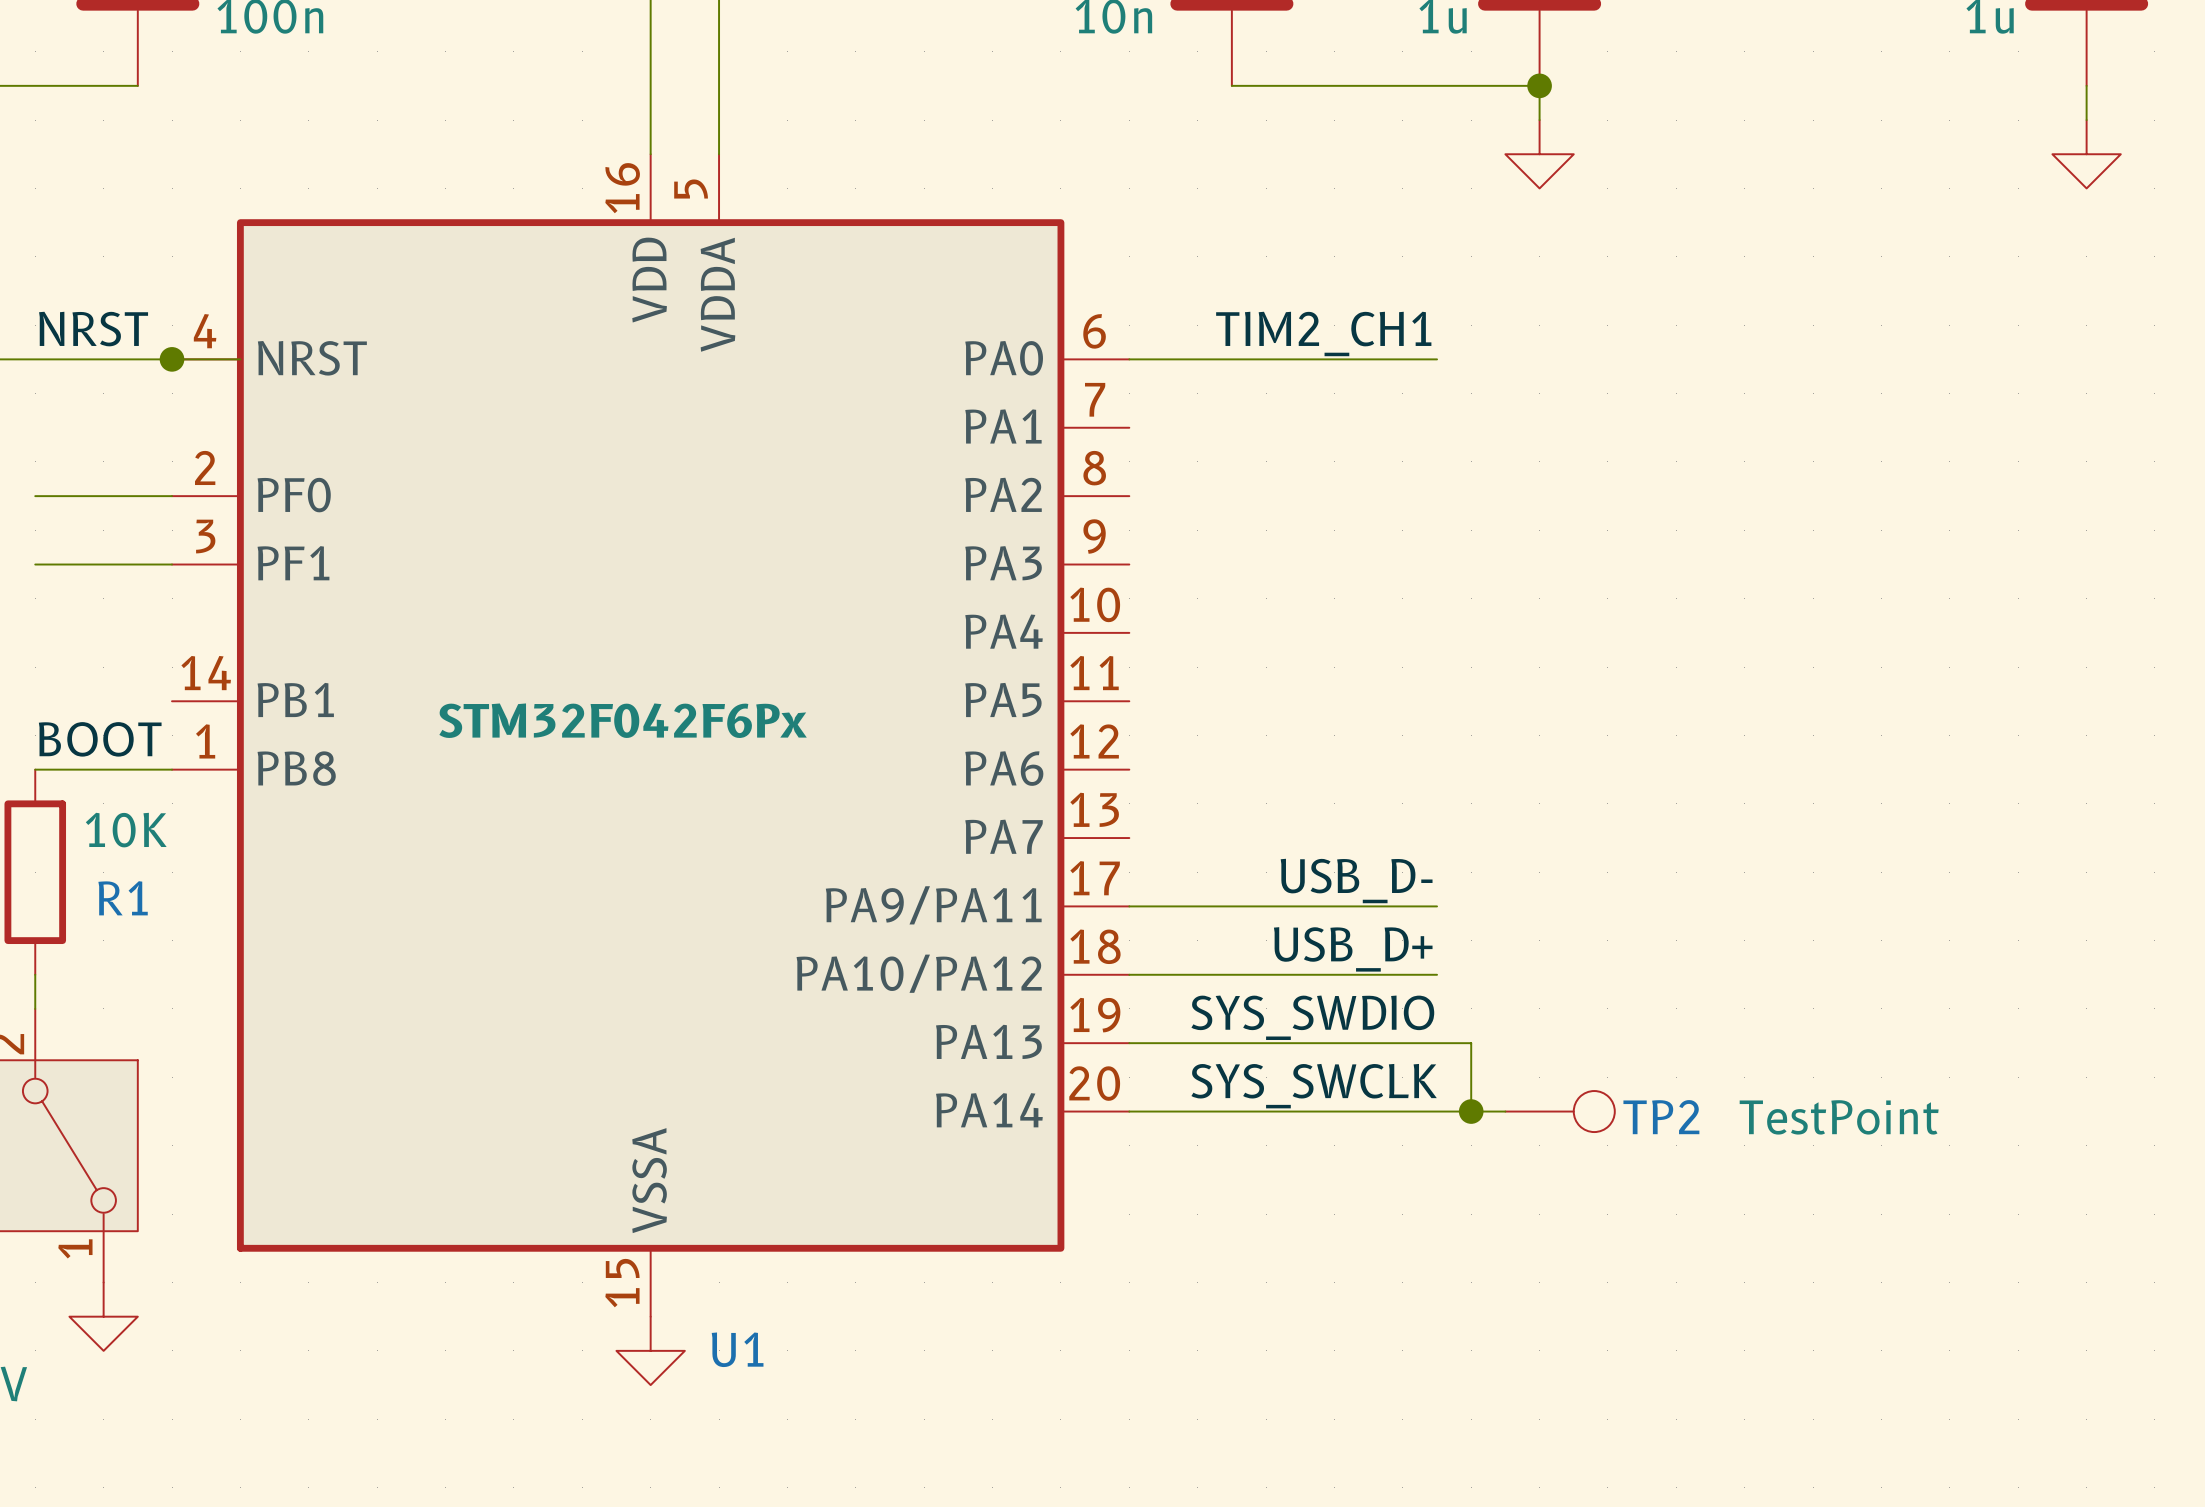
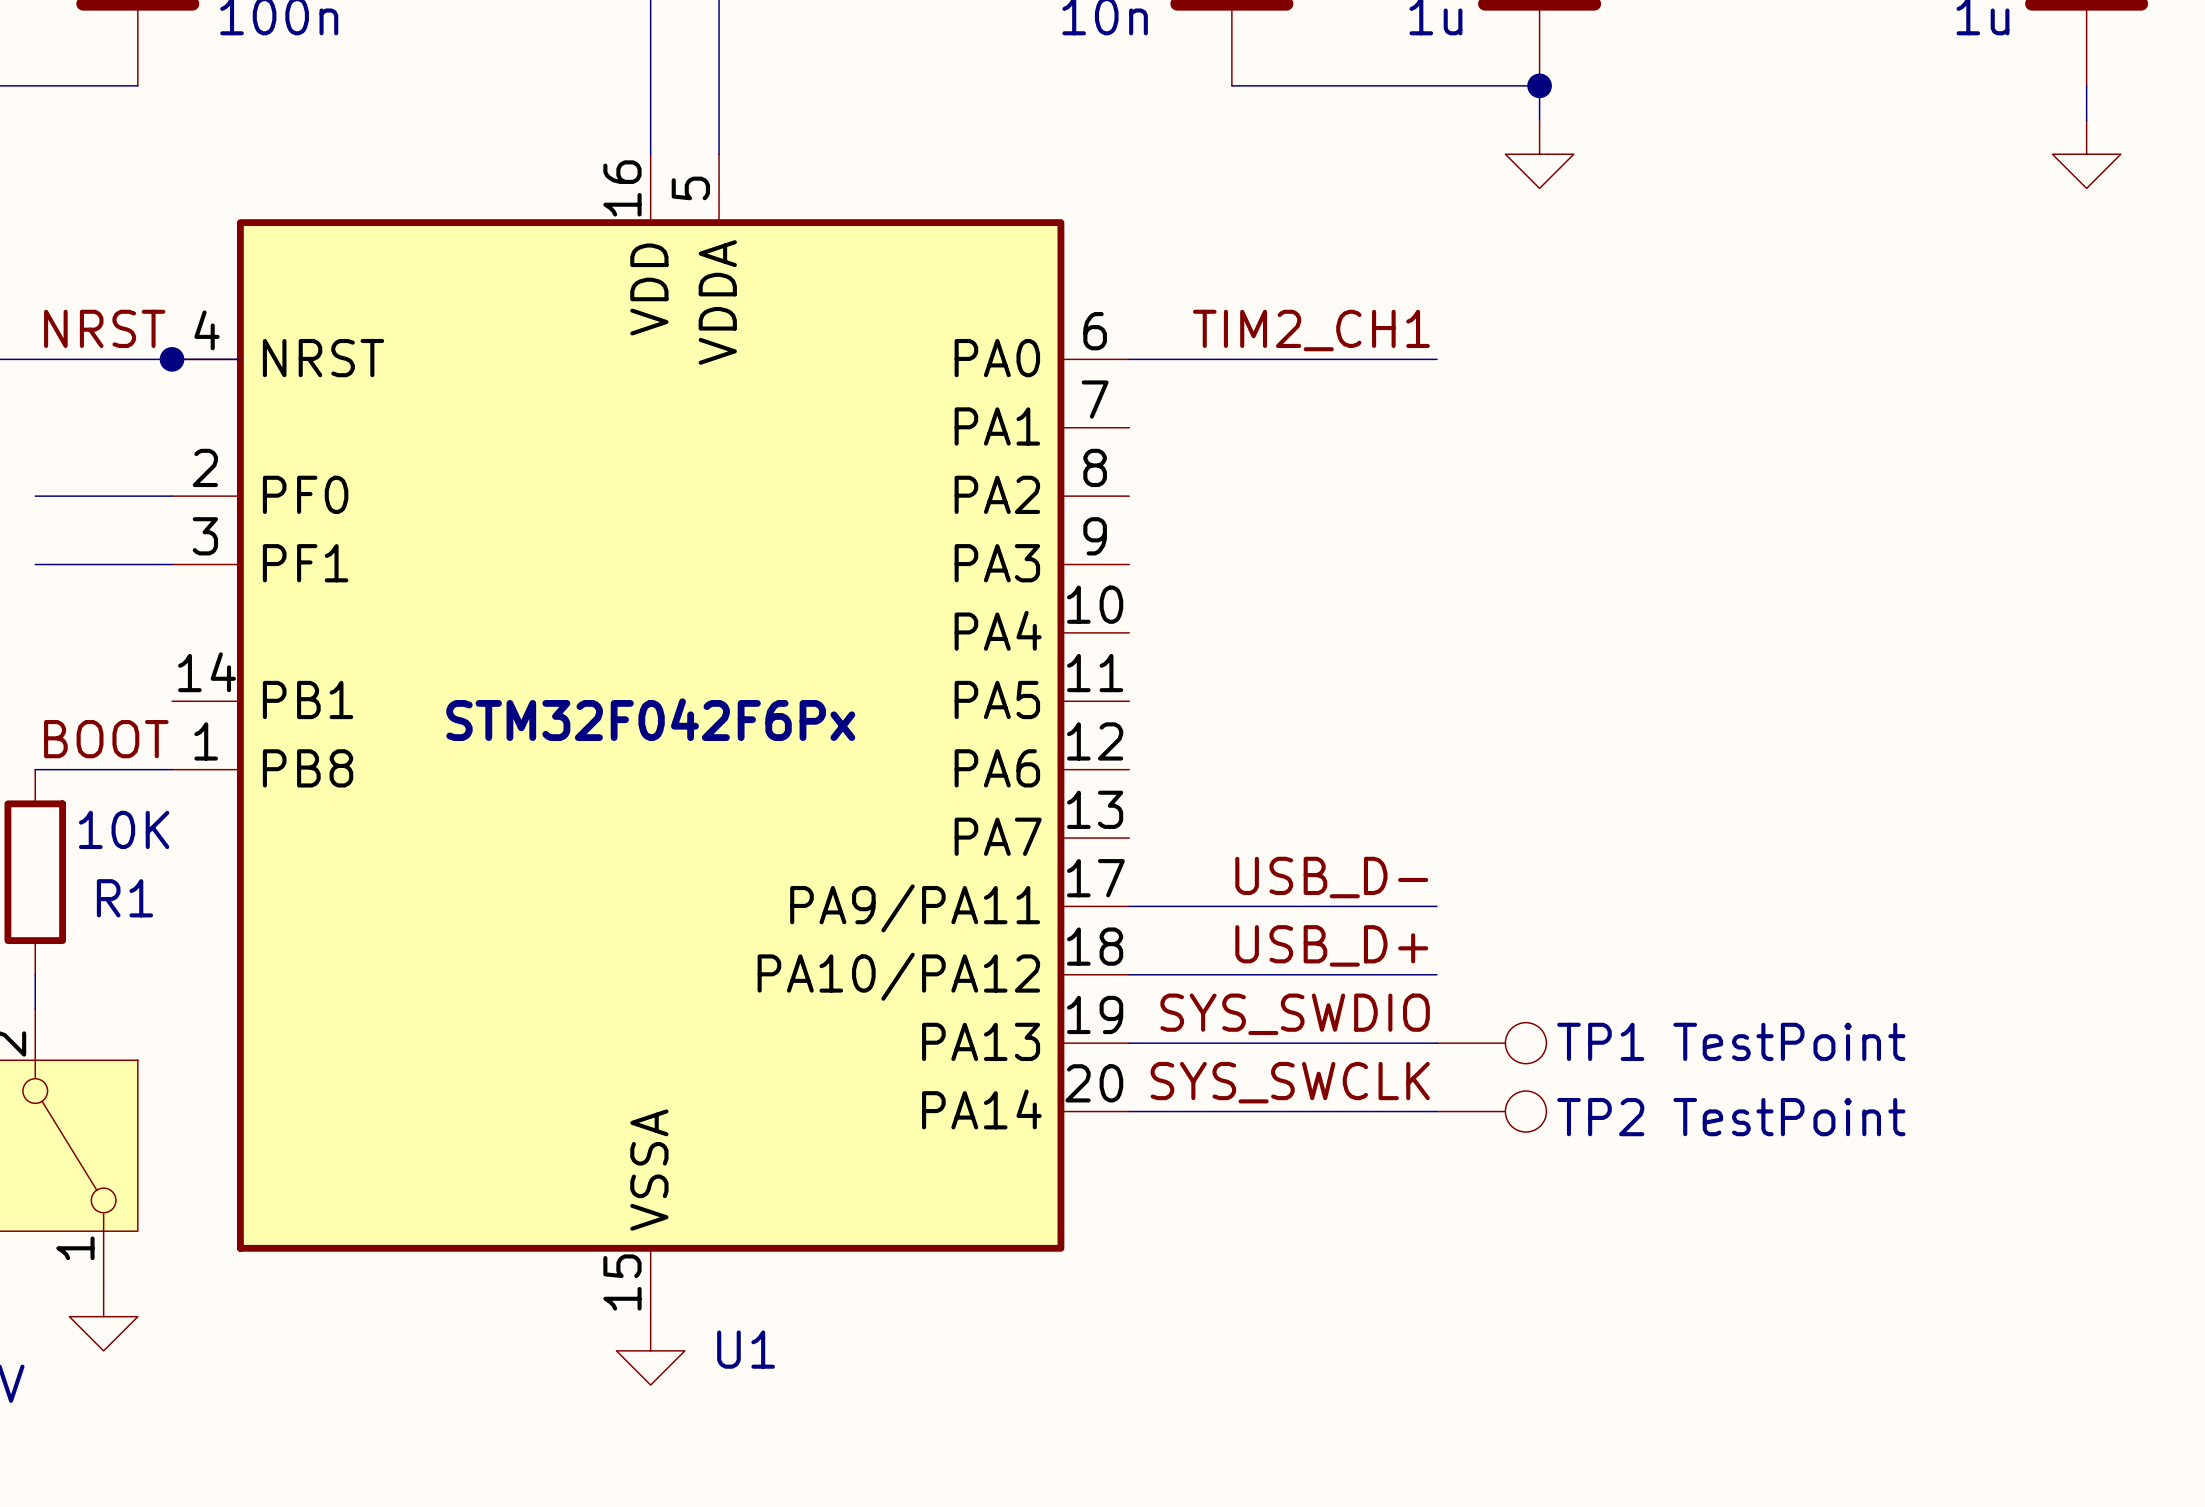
wire: (1437, 1043) (1471, 1043) (1471, 1111) -> none
TP1: none -> TestPoint (1491, 1043)
junction: (1471, 1111) -> none
TP2 position: (1560, 1111) -> (1491, 1111)

